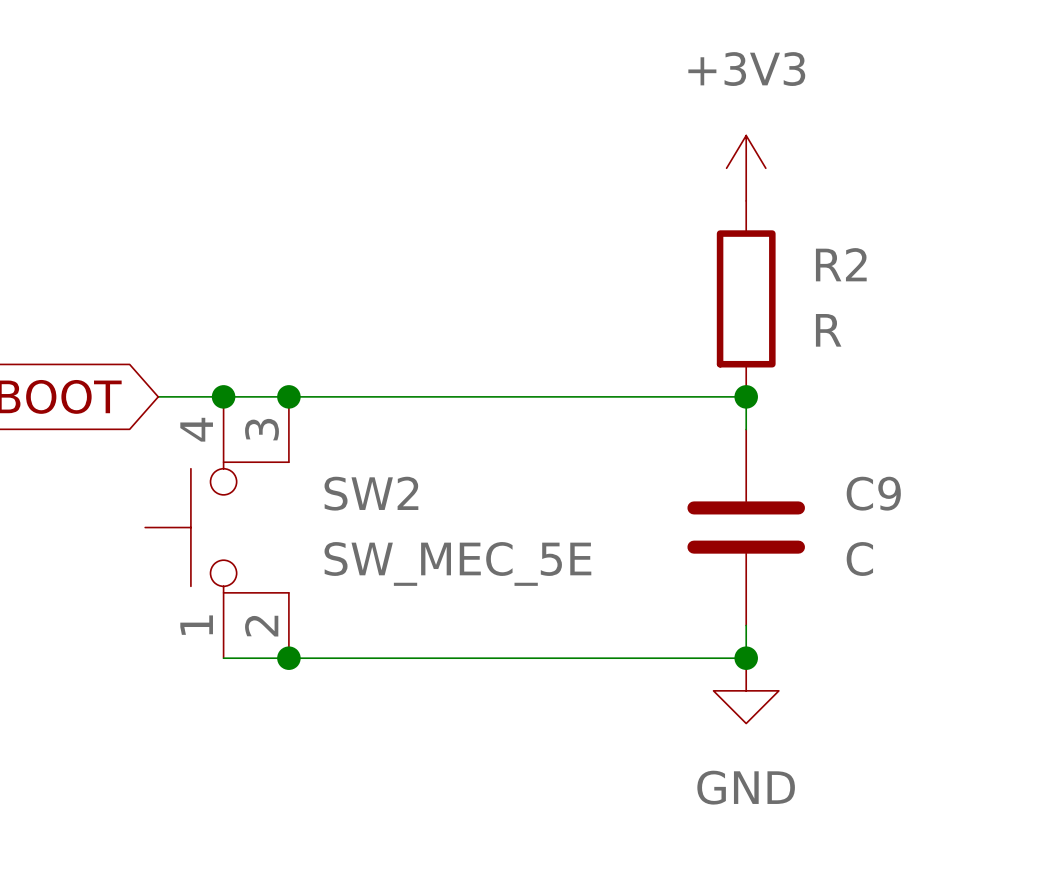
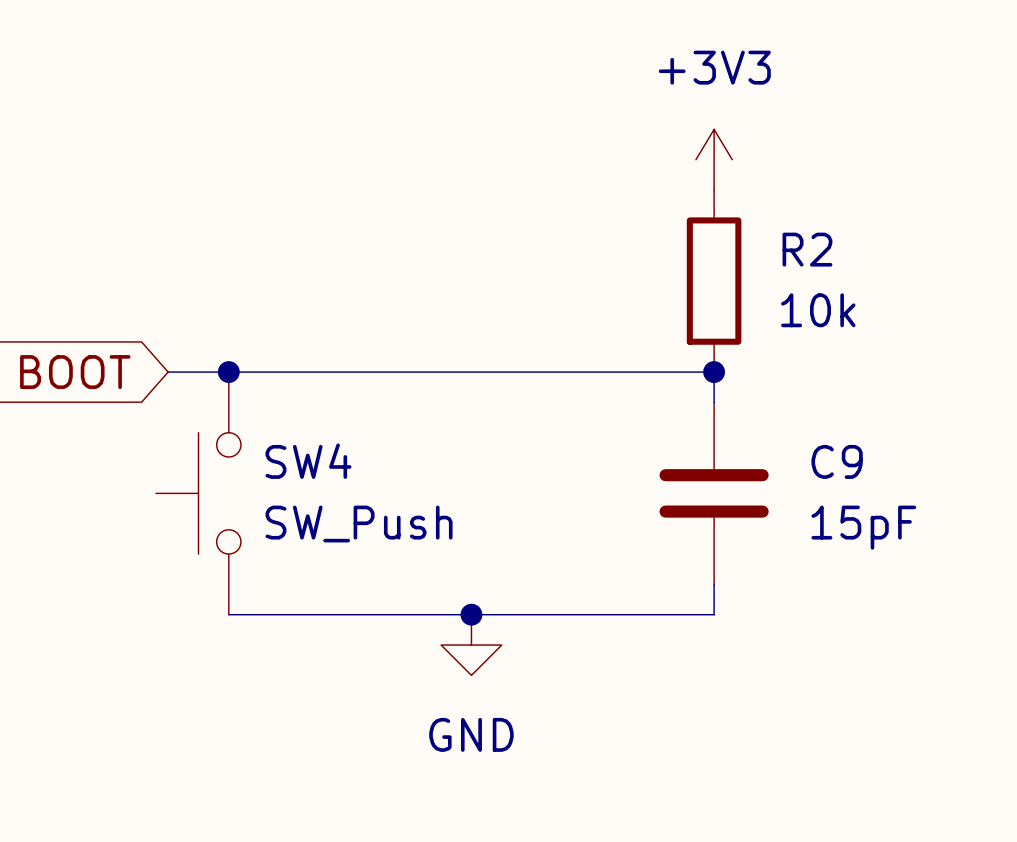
R2 value: R (828, 330) -> 10k (818, 310)
junction: (288, 396) -> none
SW4: none -> SW_Push (198, 493)
SW2: SW_MEC_5E (217, 527) -> none
C9 value: C (859, 559) -> 15pF (863, 527)
junction: (288, 658) -> none
junction: none -> (471, 614)
junction: (746, 658) -> none
power symbol position: GND (746, 690) -> GND (471, 645)

